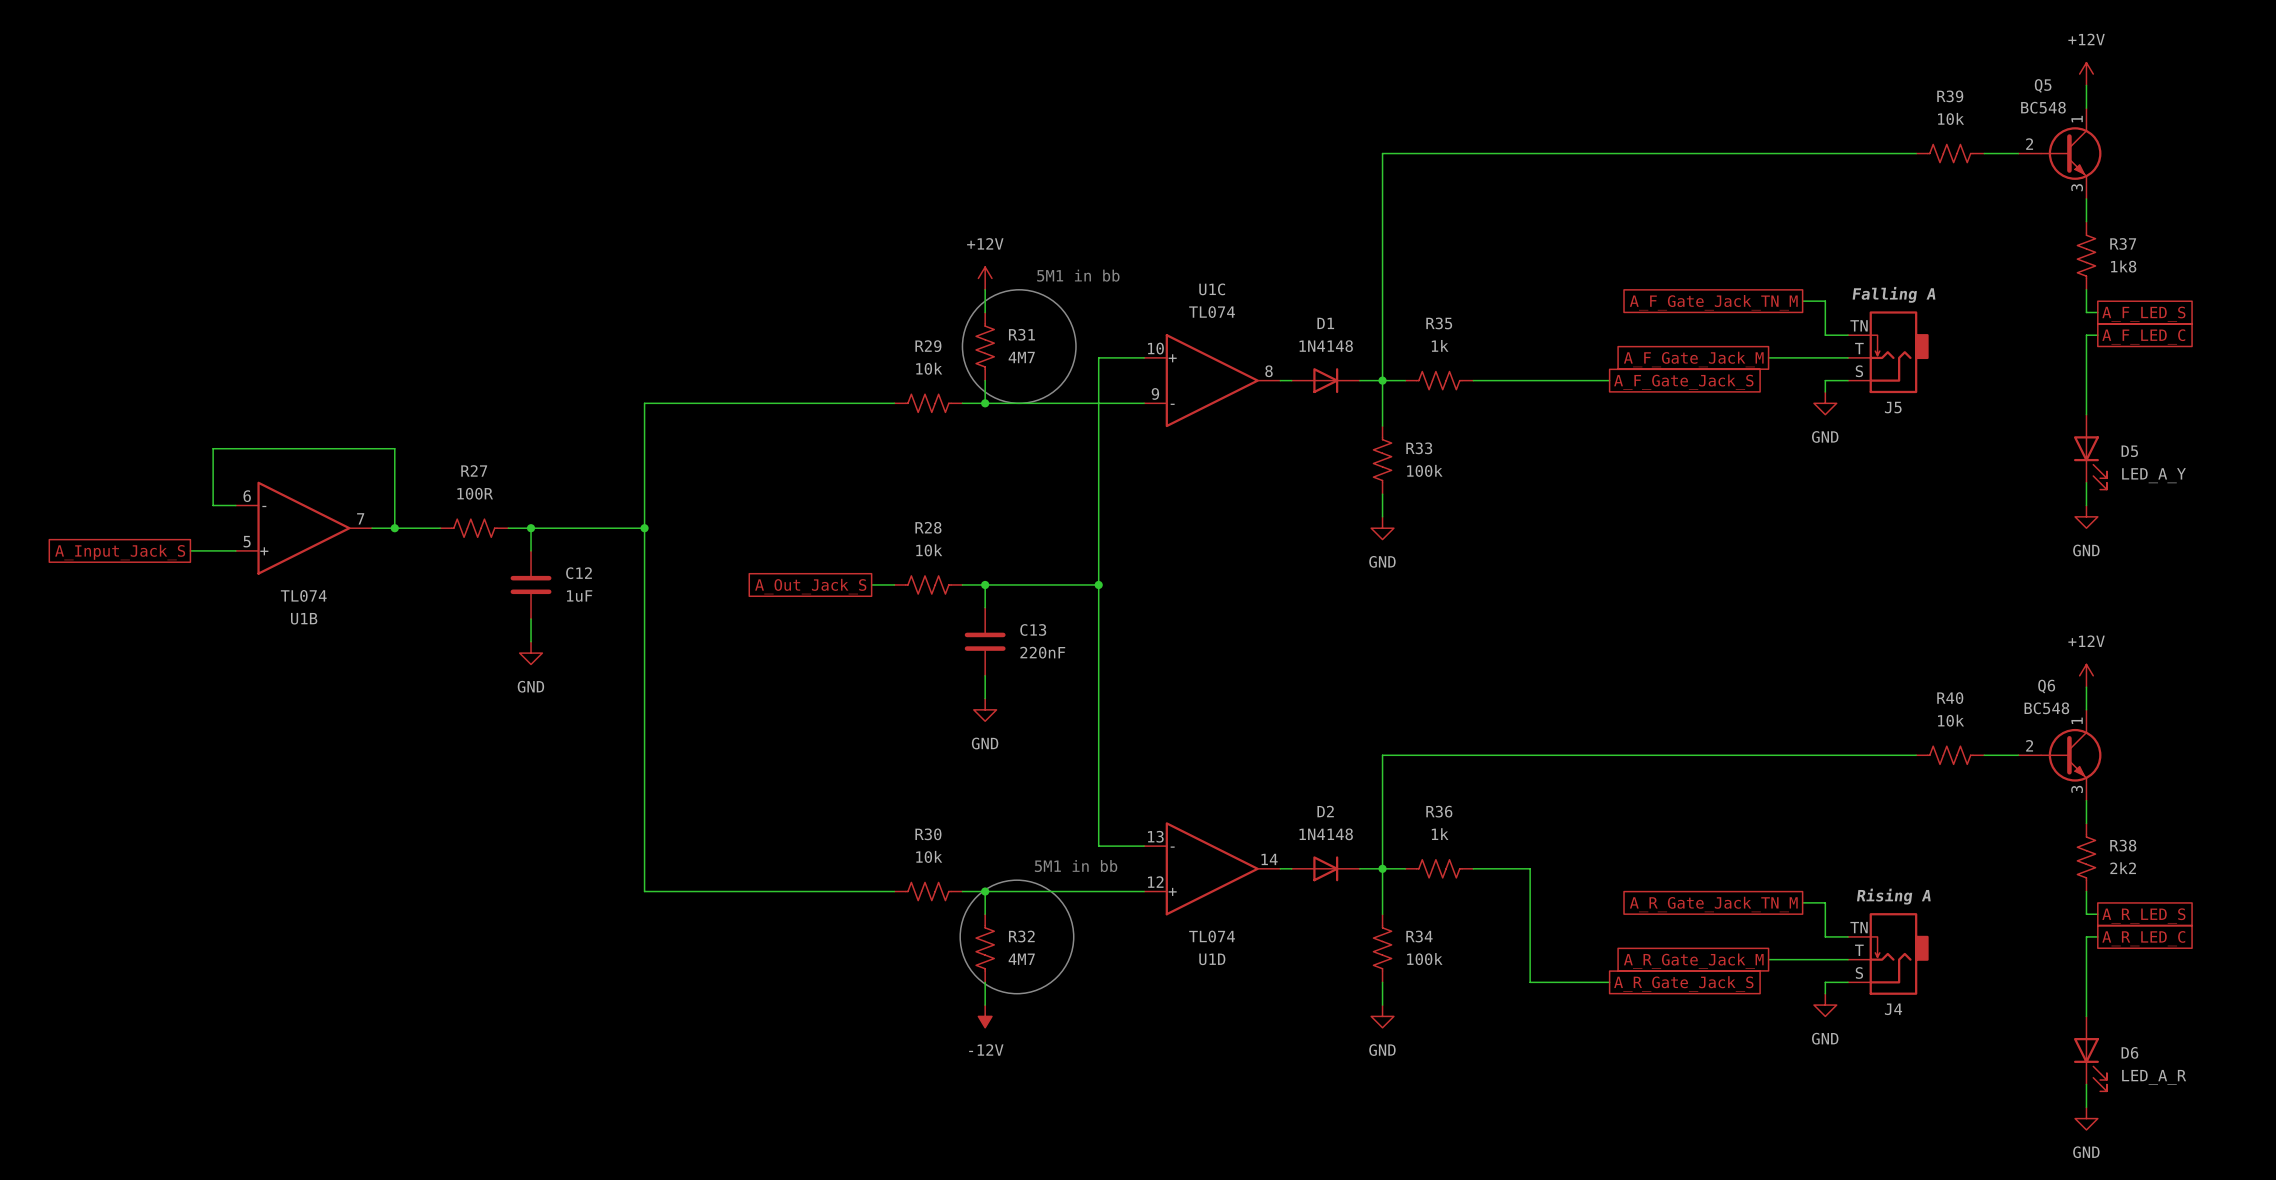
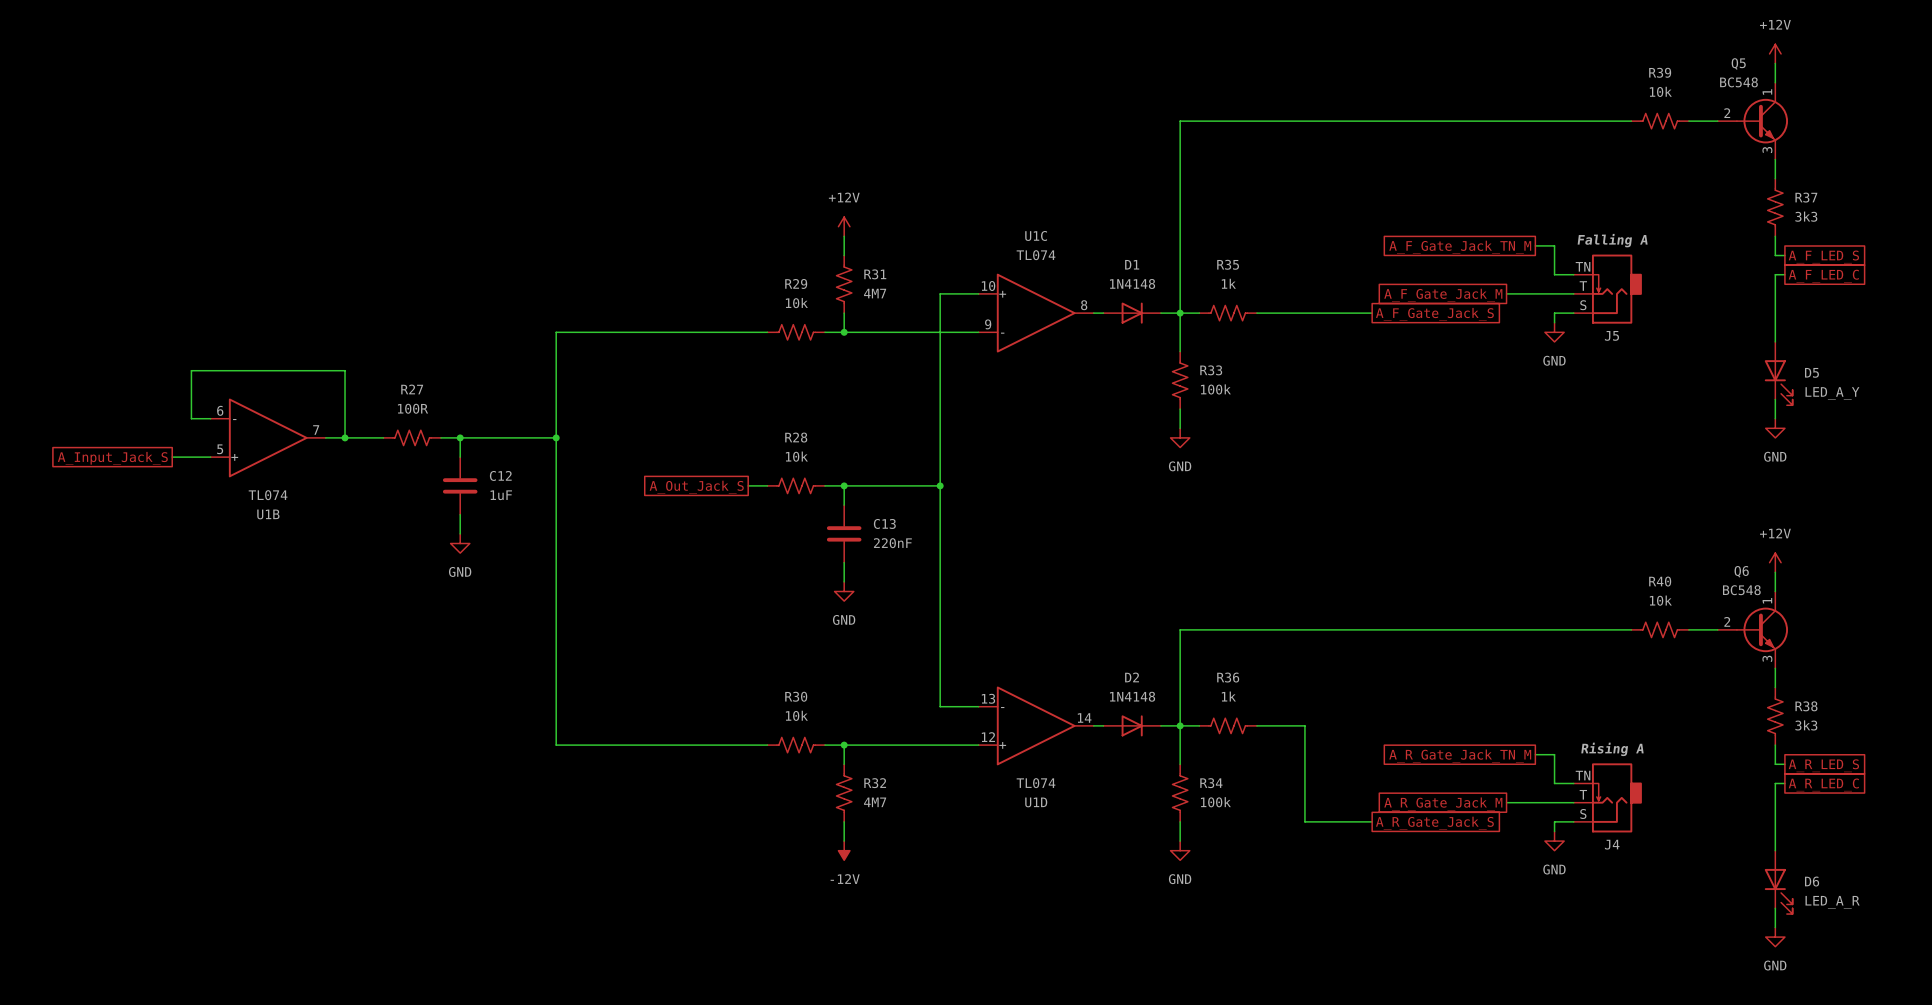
R37 value: 1k8 (2123, 266) -> 3k3 (1806, 216)
text: 5M1 in bb (1078, 275) -> none
drawing: [962, 289, 1076, 404] -> none
text: 5M1 in bb (1076, 866) -> none
R38 value: 2k2 (2123, 868) -> 3k3 (1806, 725)
drawing: [960, 880, 1074, 994] -> none

